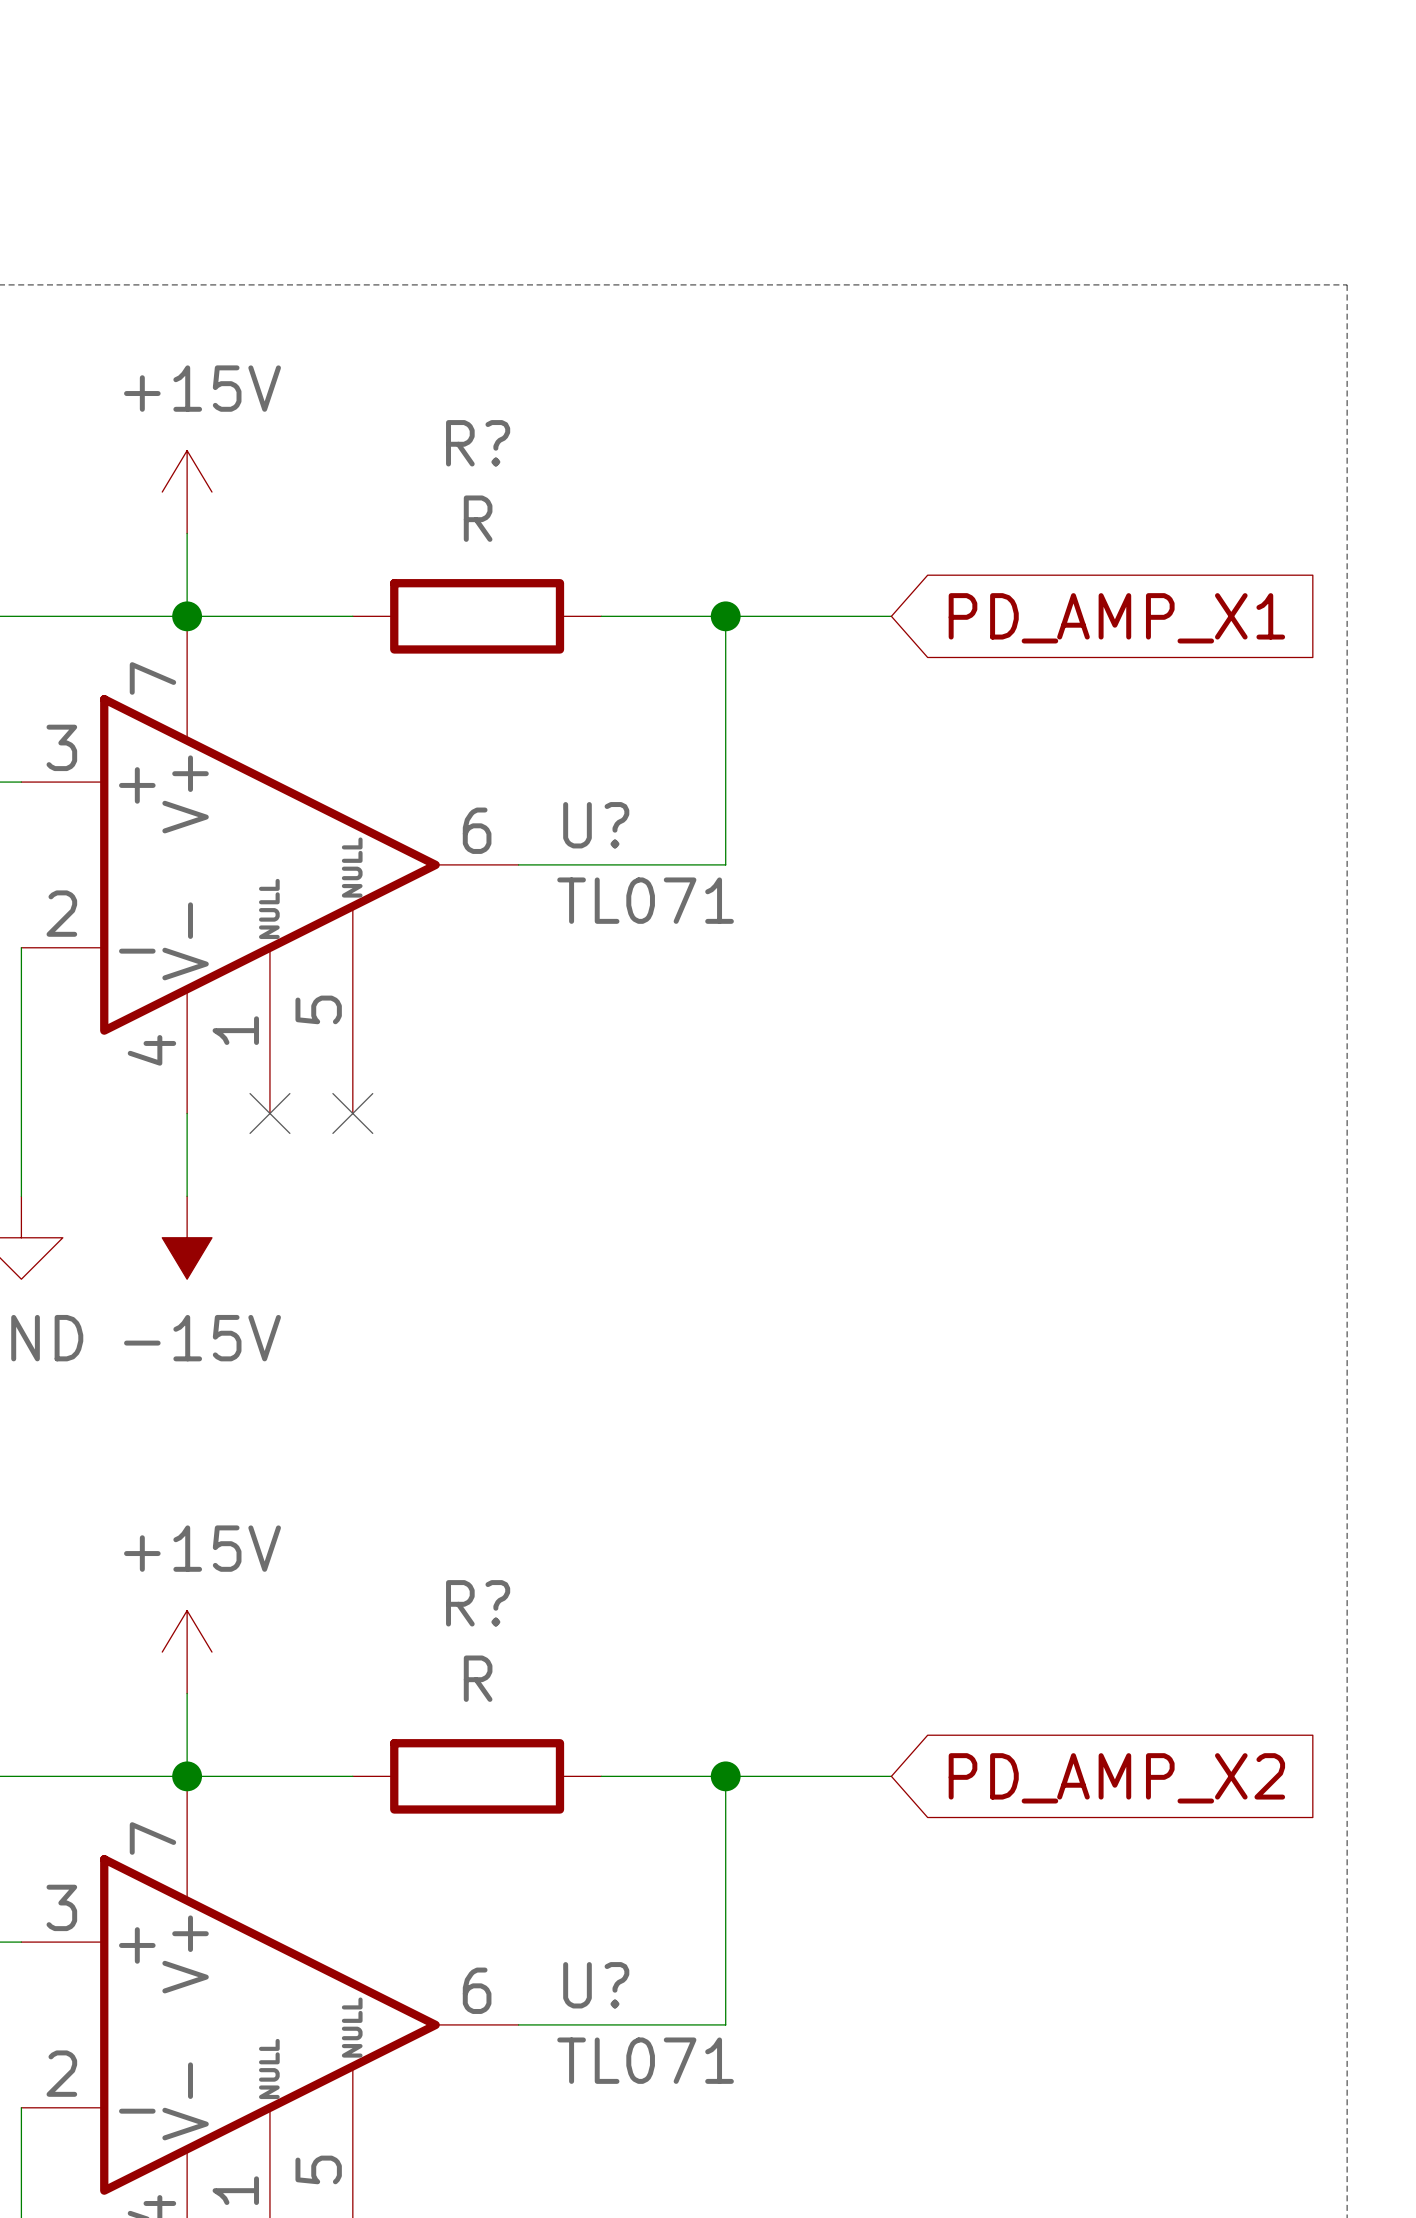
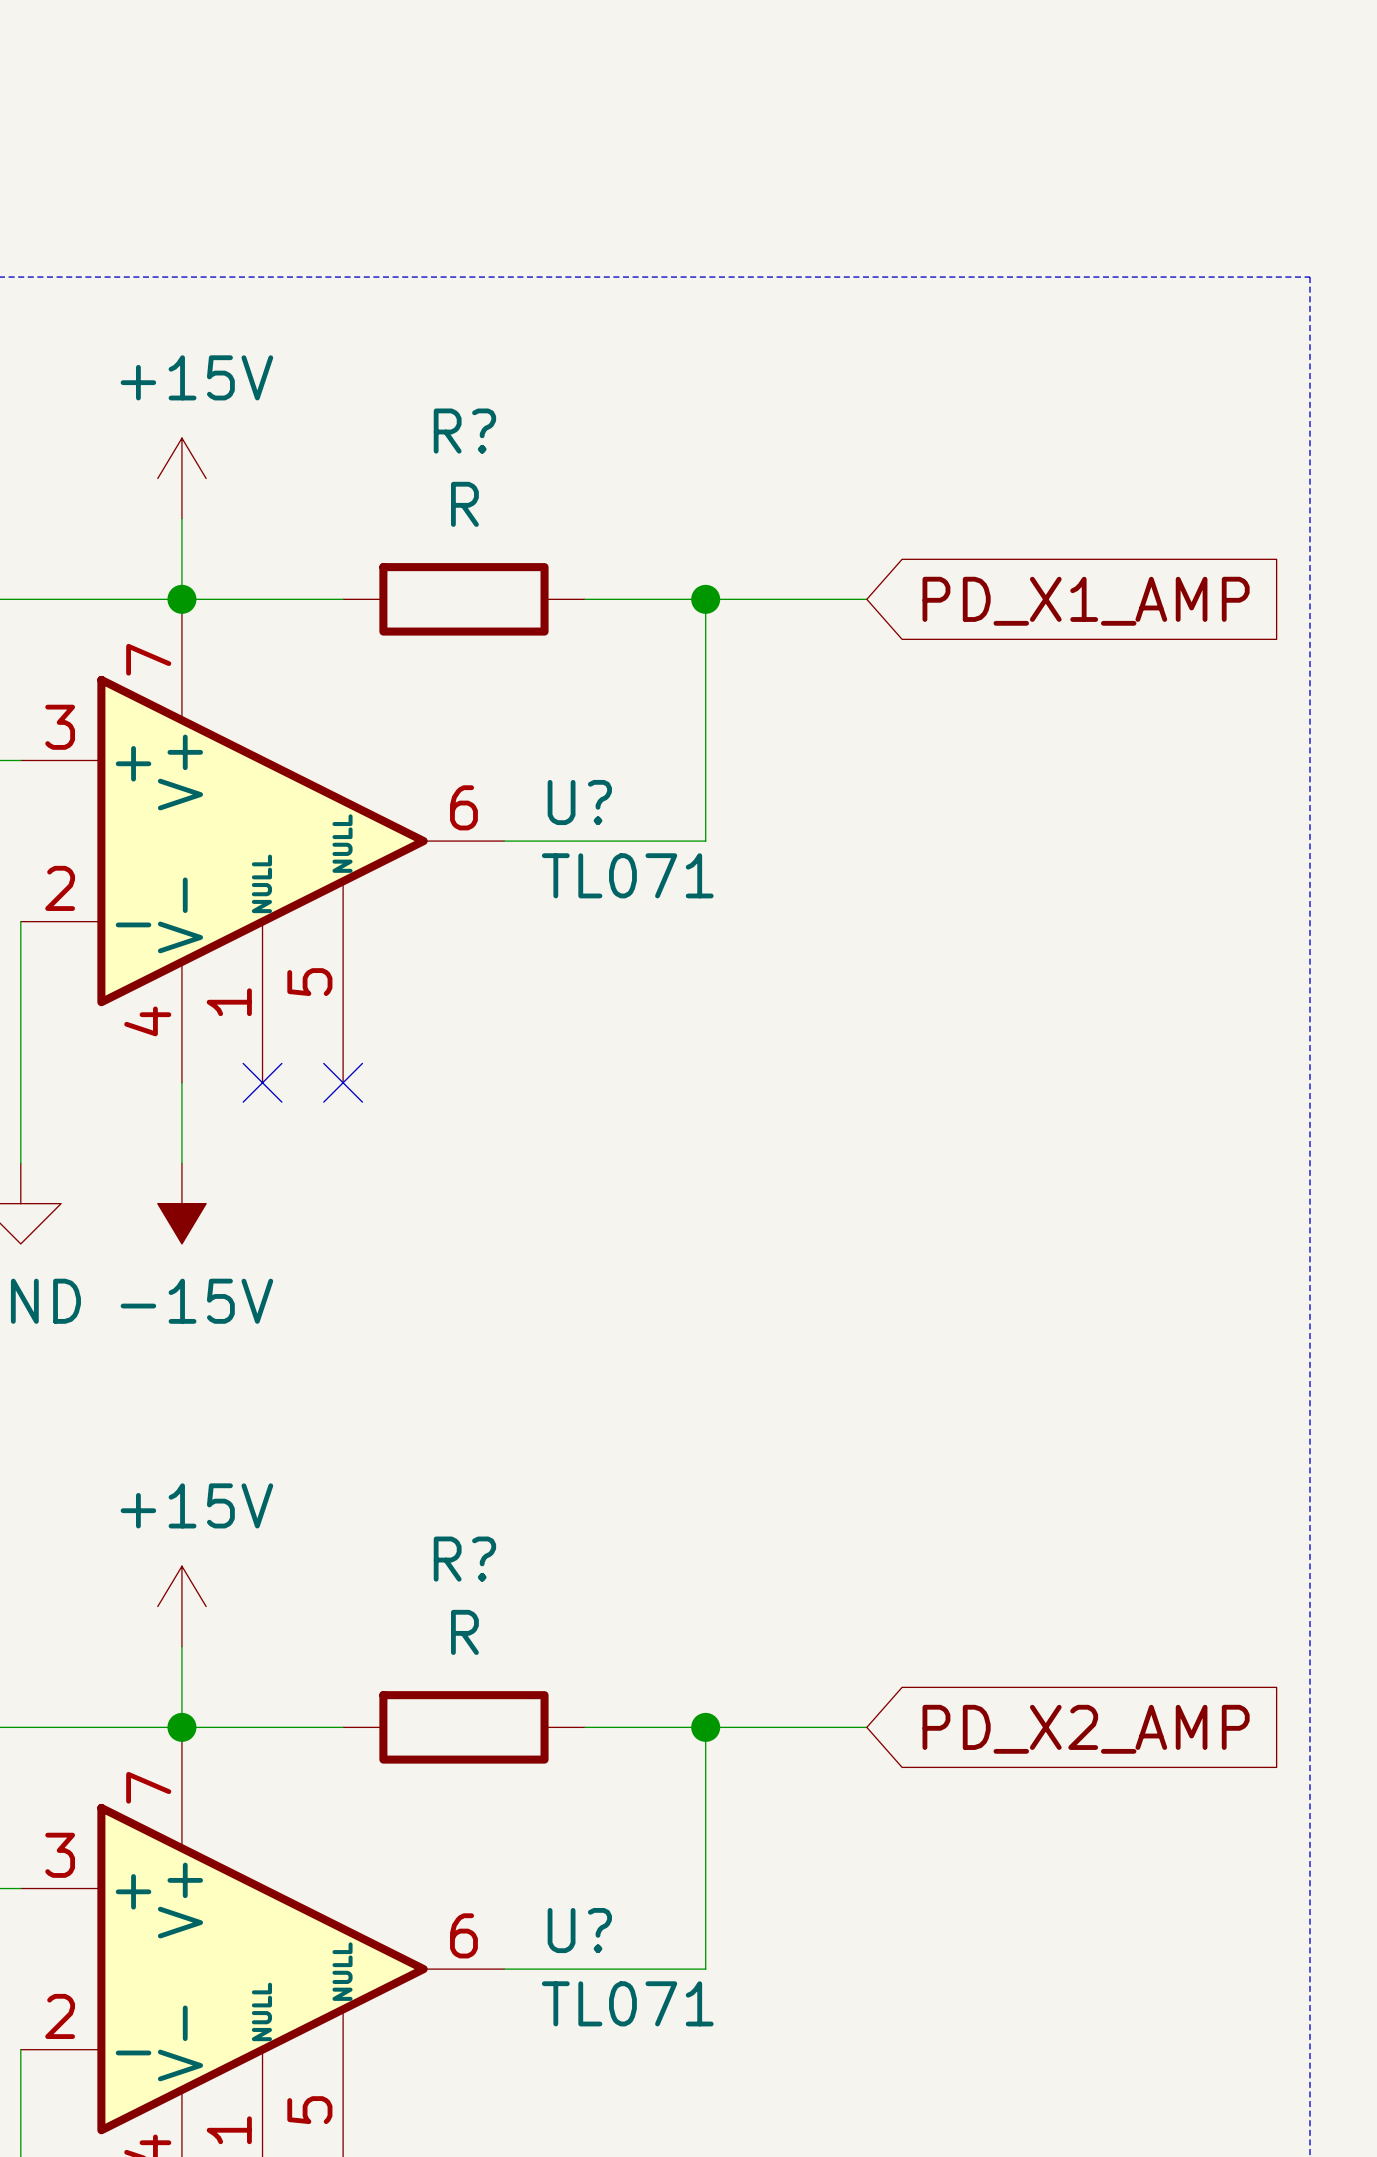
global label: PD_AMP_X1 (1116, 618) -> PD_X1_AMP (1086, 601)
global label: PD_AMP_X2 (1116, 1778) -> PD_X2_AMP (1086, 1729)

